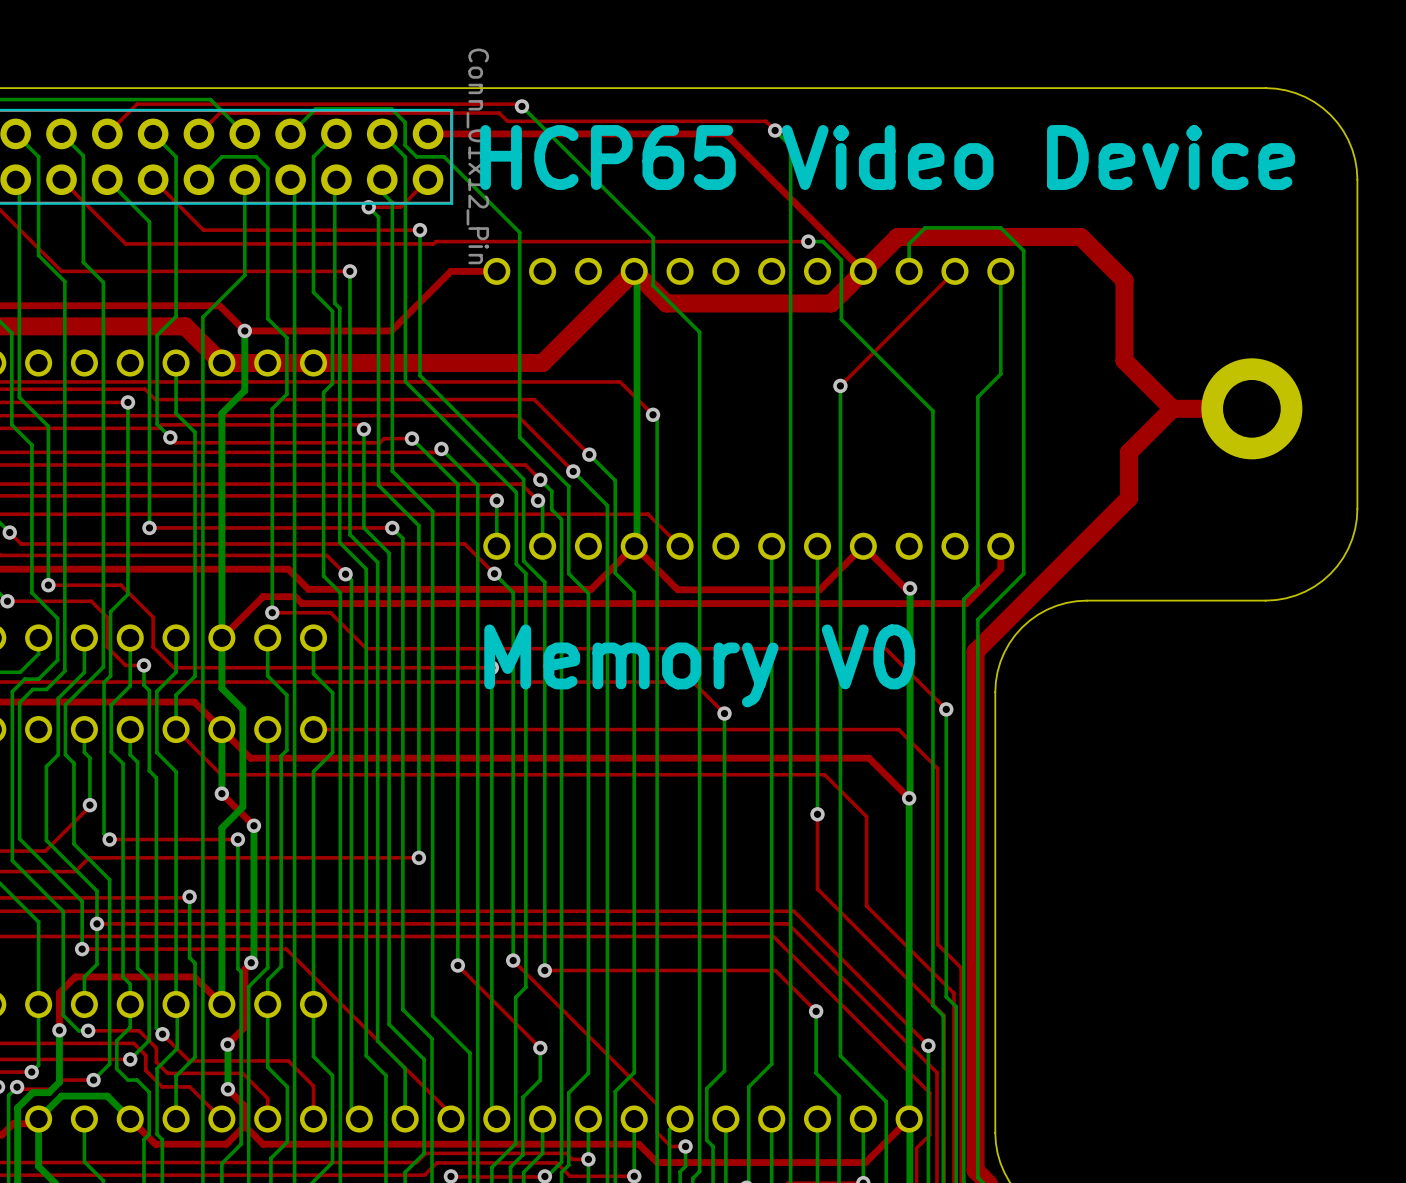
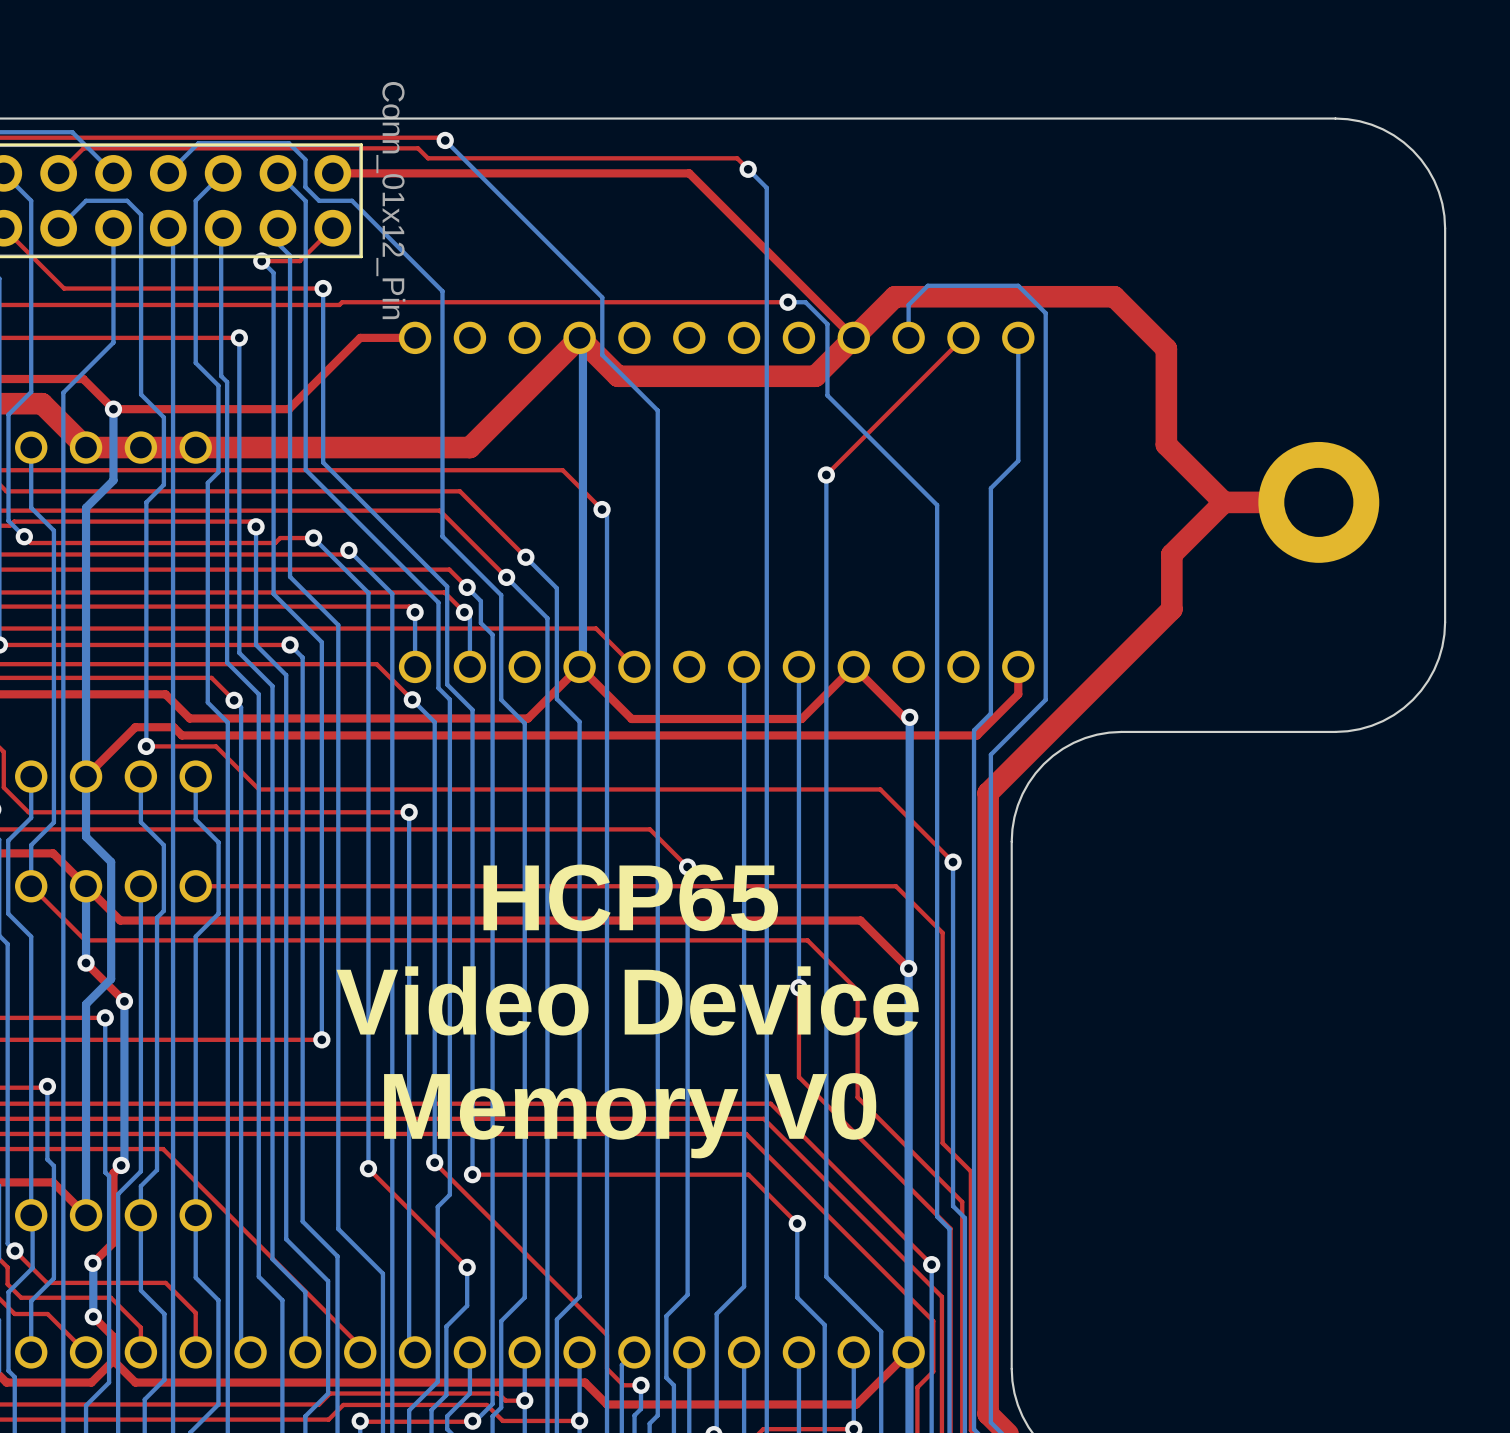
text: HCP65 Video Device (887, 157) -> none
text position: Memory V0 (699, 665) -> Memory V0 (630, 1115)
text: none -> HCP65 (630, 897)
text: none -> Video Device (627, 1000)

